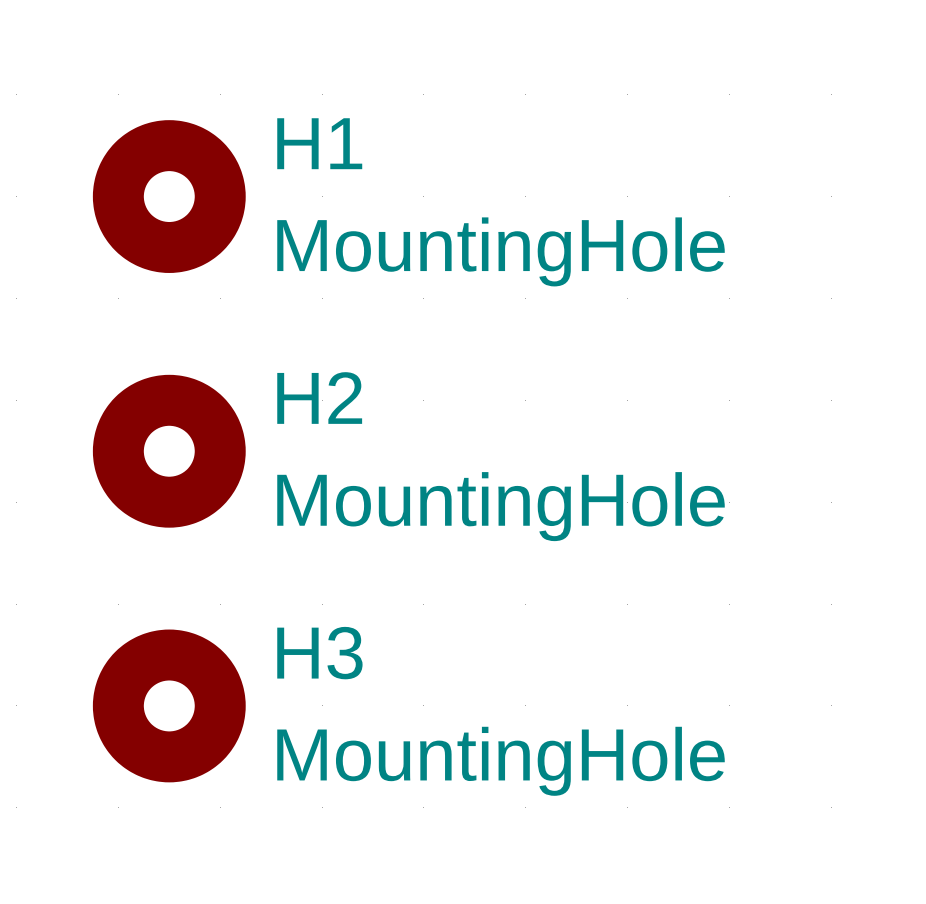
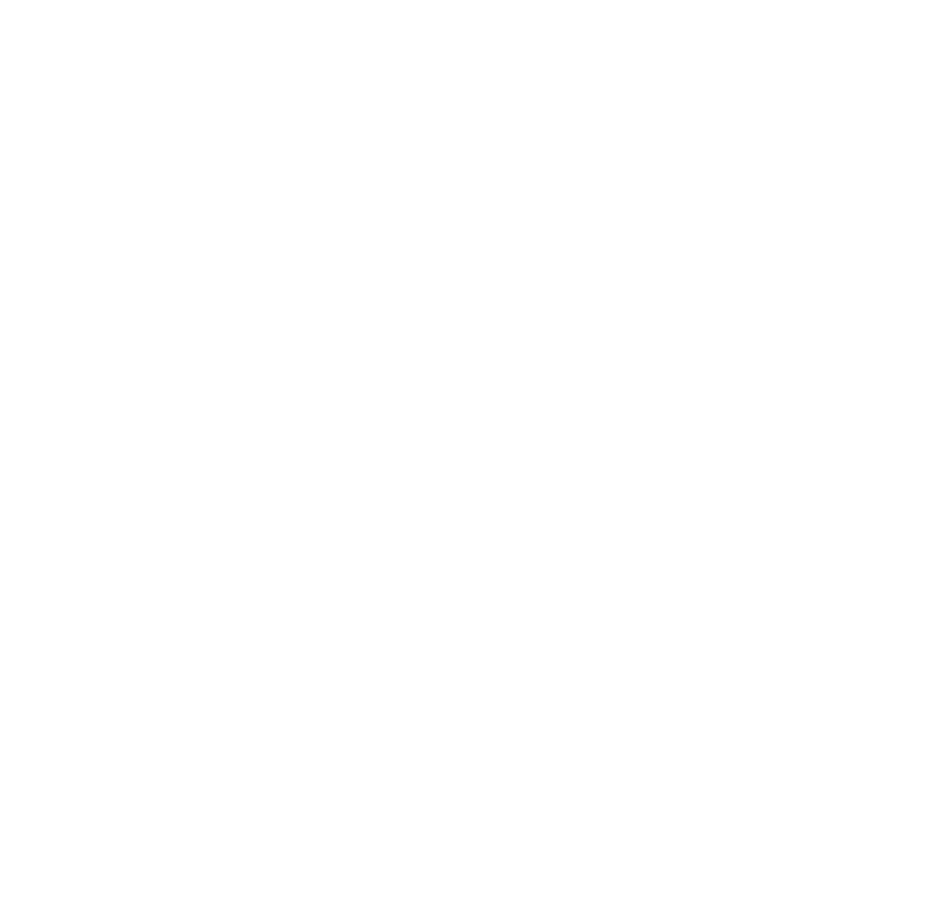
H1: MountingHole (169, 196) -> none
H2: MountingHole (169, 451) -> none
H3: MountingHole (169, 705) -> none

